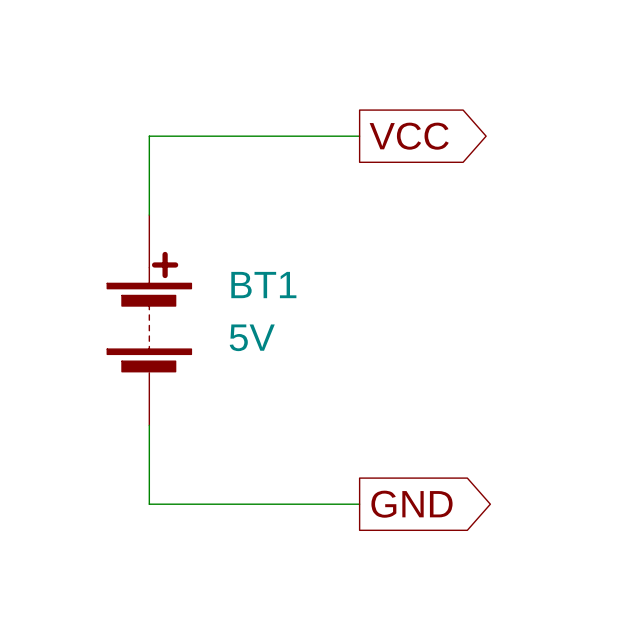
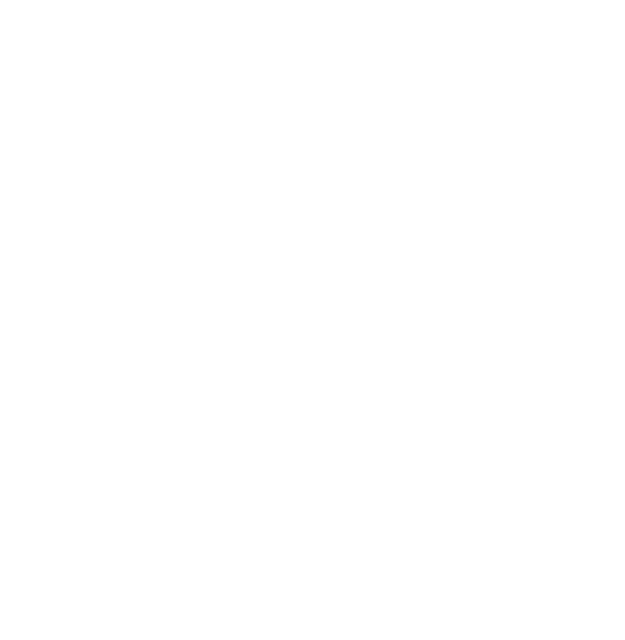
wire: (359, 136) (149, 136) (149, 215) -> none
global label: VCC (409, 136) -> none
BT1: 5V (149, 320) -> none
wire: (149, 425) (149, 504) (359, 504) -> none
global label: GND (411, 504) -> none

